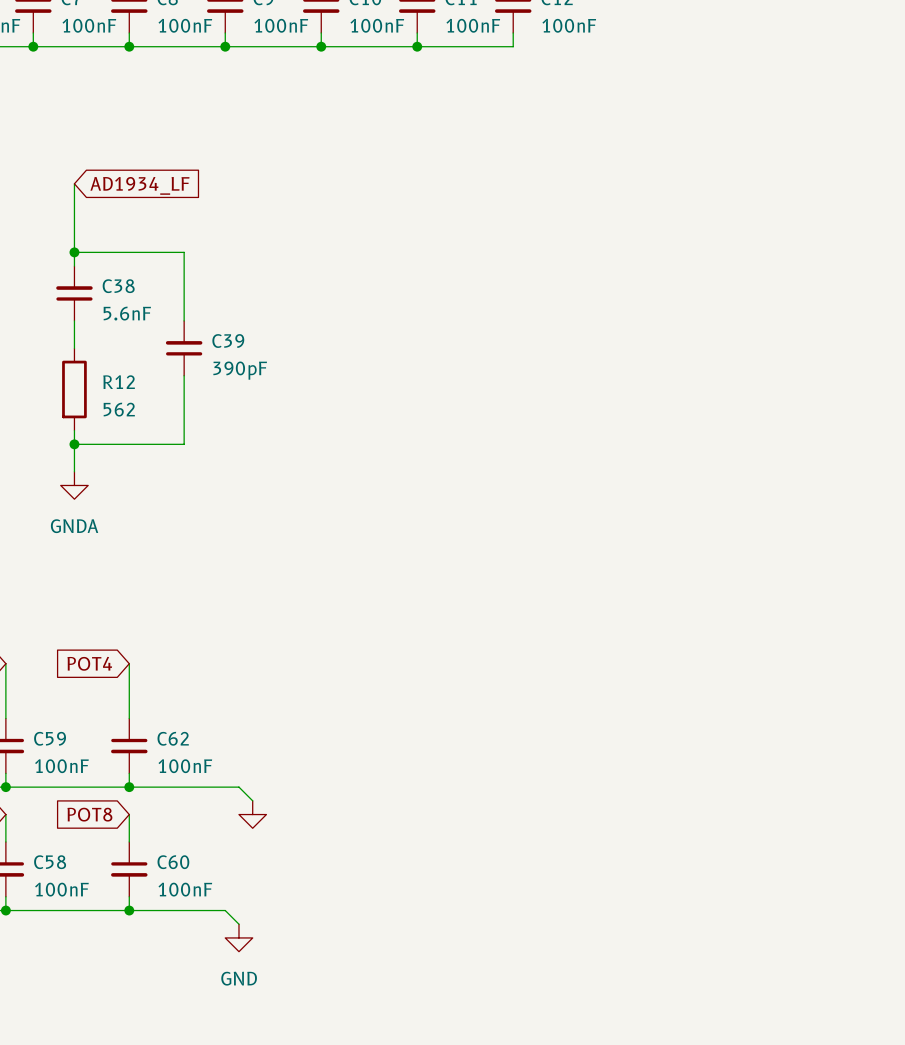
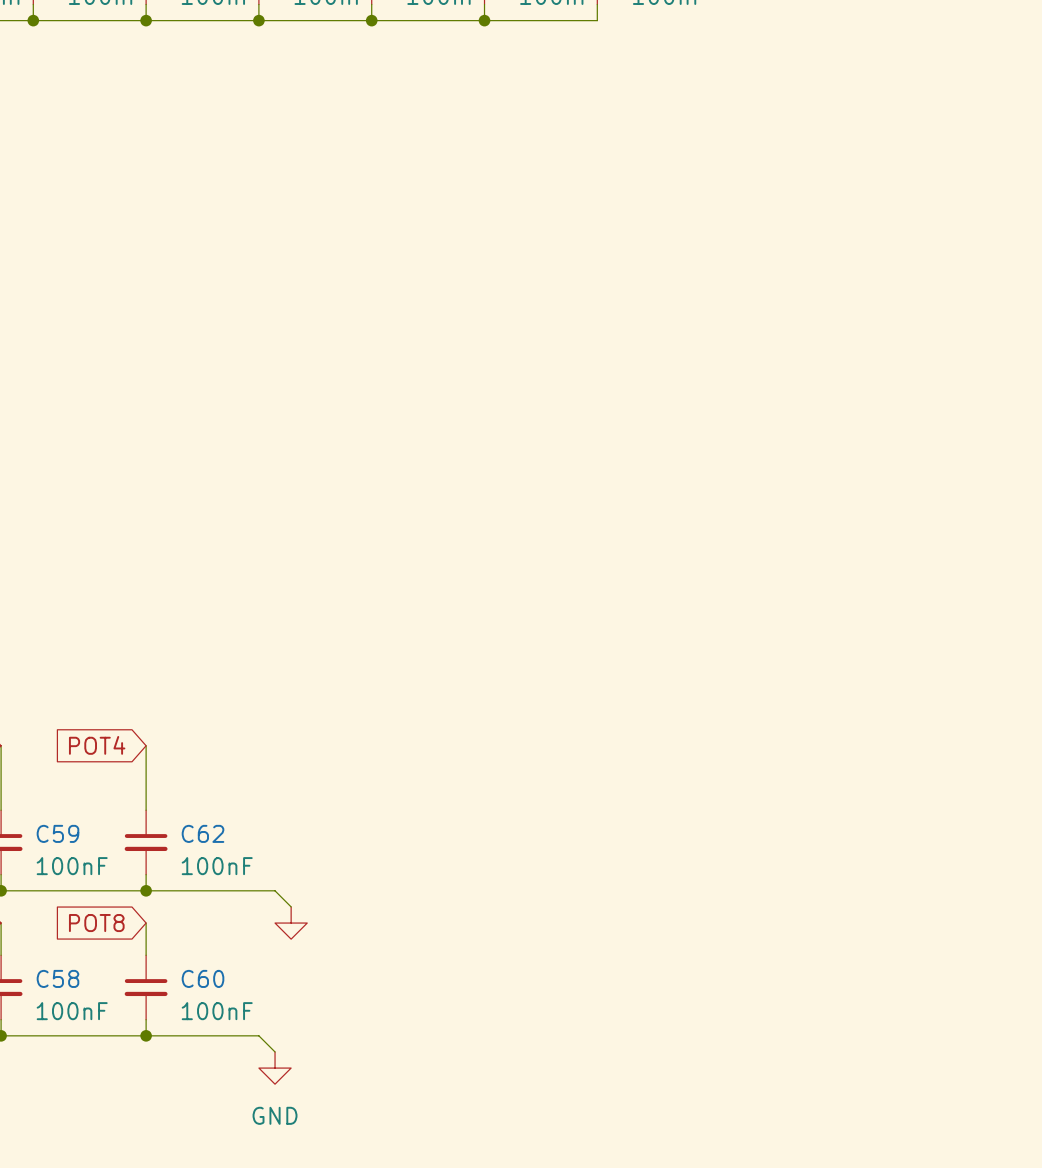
wire: (74, 183) (74, 266) -> none
global label: AD1934_LF (139, 185) -> none
wire: (74, 252) (184, 252) (184, 320) -> none
junction: (74, 252) -> none
C38: 5.6nF (74, 293) -> none
wire: (74, 320) (74, 348) -> none
C39: 390pF (184, 348) -> none
wire: (184, 375) (184, 444) (74, 444) -> none
R12: 562 (74, 389) -> none
wire: (74, 430) (74, 471) -> none
junction: (74, 444) -> none
power symbol: GNDA (74, 485) -> none

